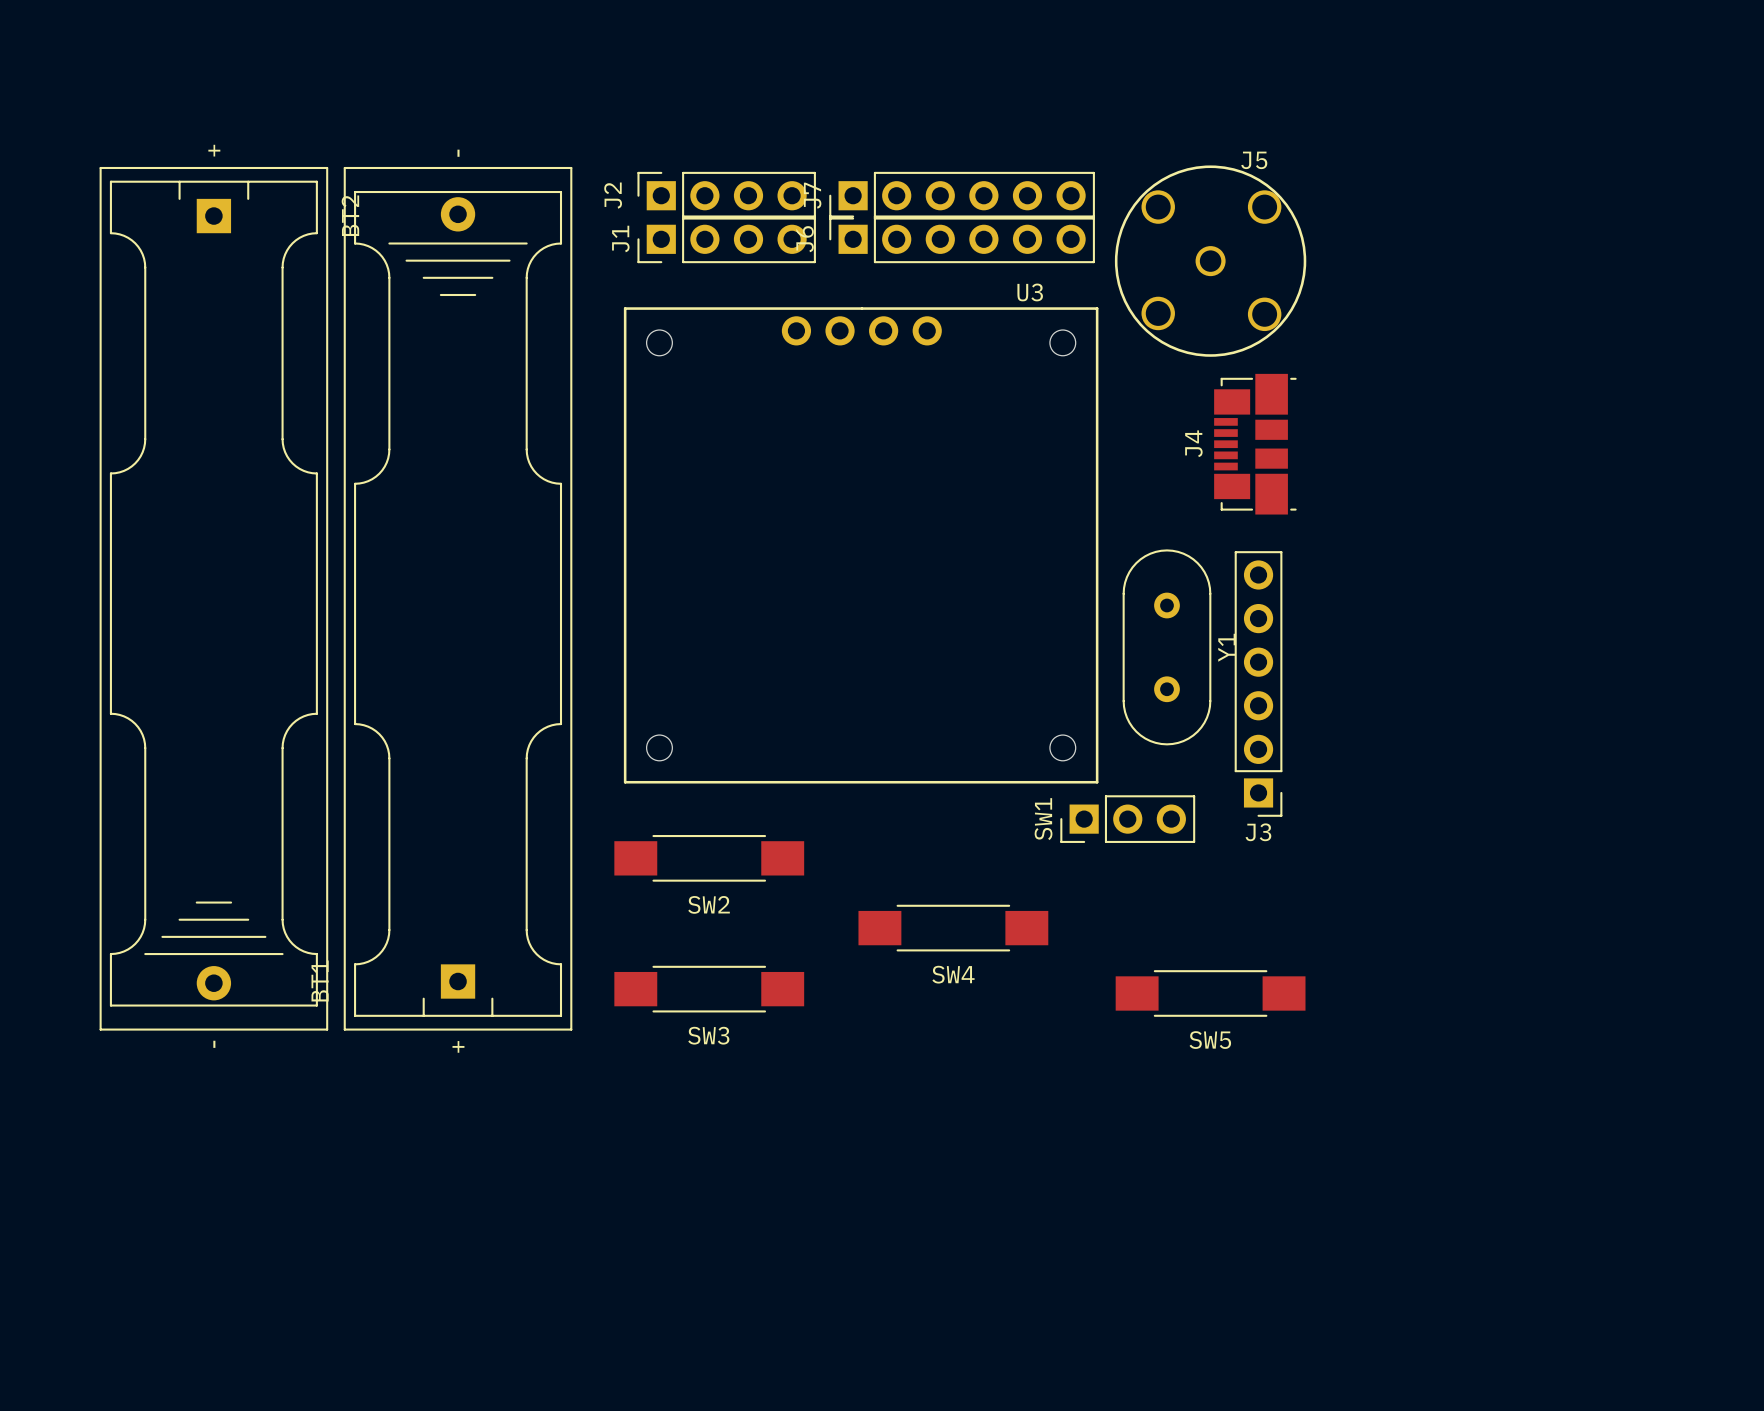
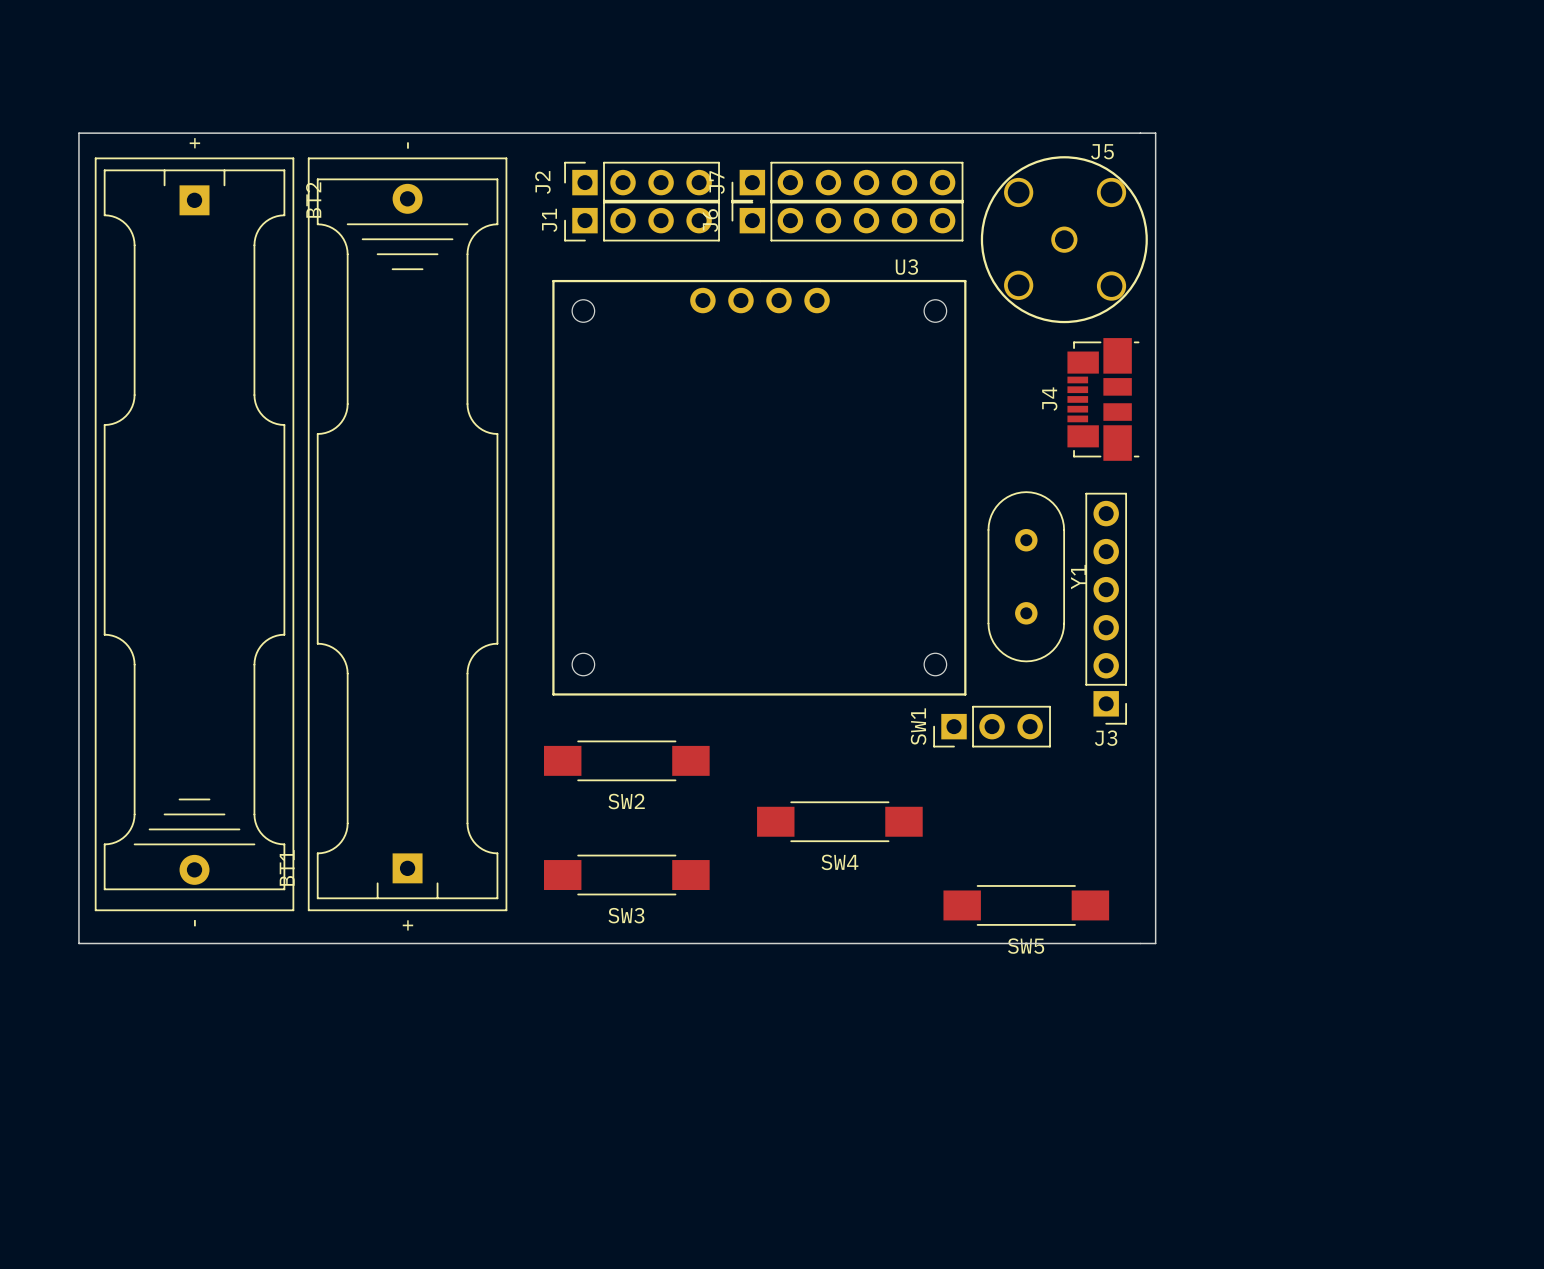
board edge: none -> (78, 133) (1155, 133) (1155, 943) (78, 943) (78, 133)
SW5 position: (1210, 993) -> (1026, 905)

